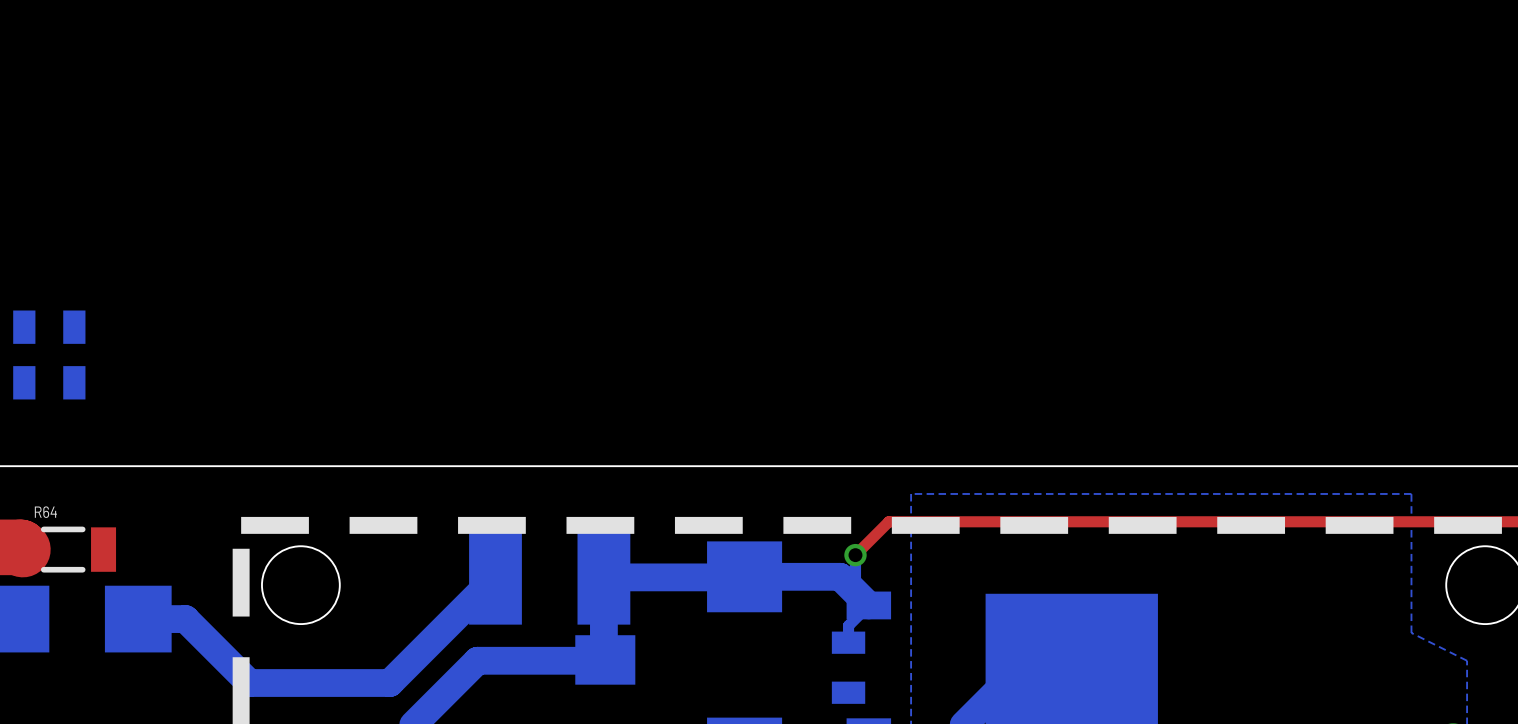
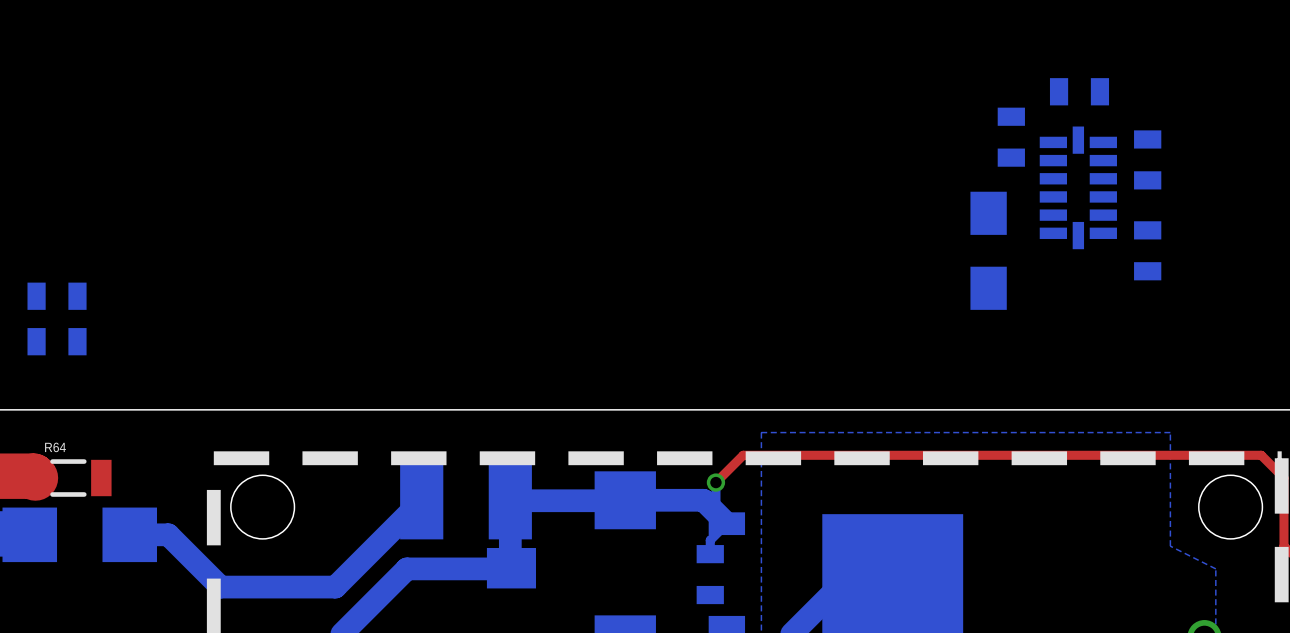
part: none -> (1079, 91)
part: none -> (1011, 137)
part: none -> (1147, 159)
part: none -> (1078, 187)
part: none -> (988, 250)
part: none -> (1147, 250)

